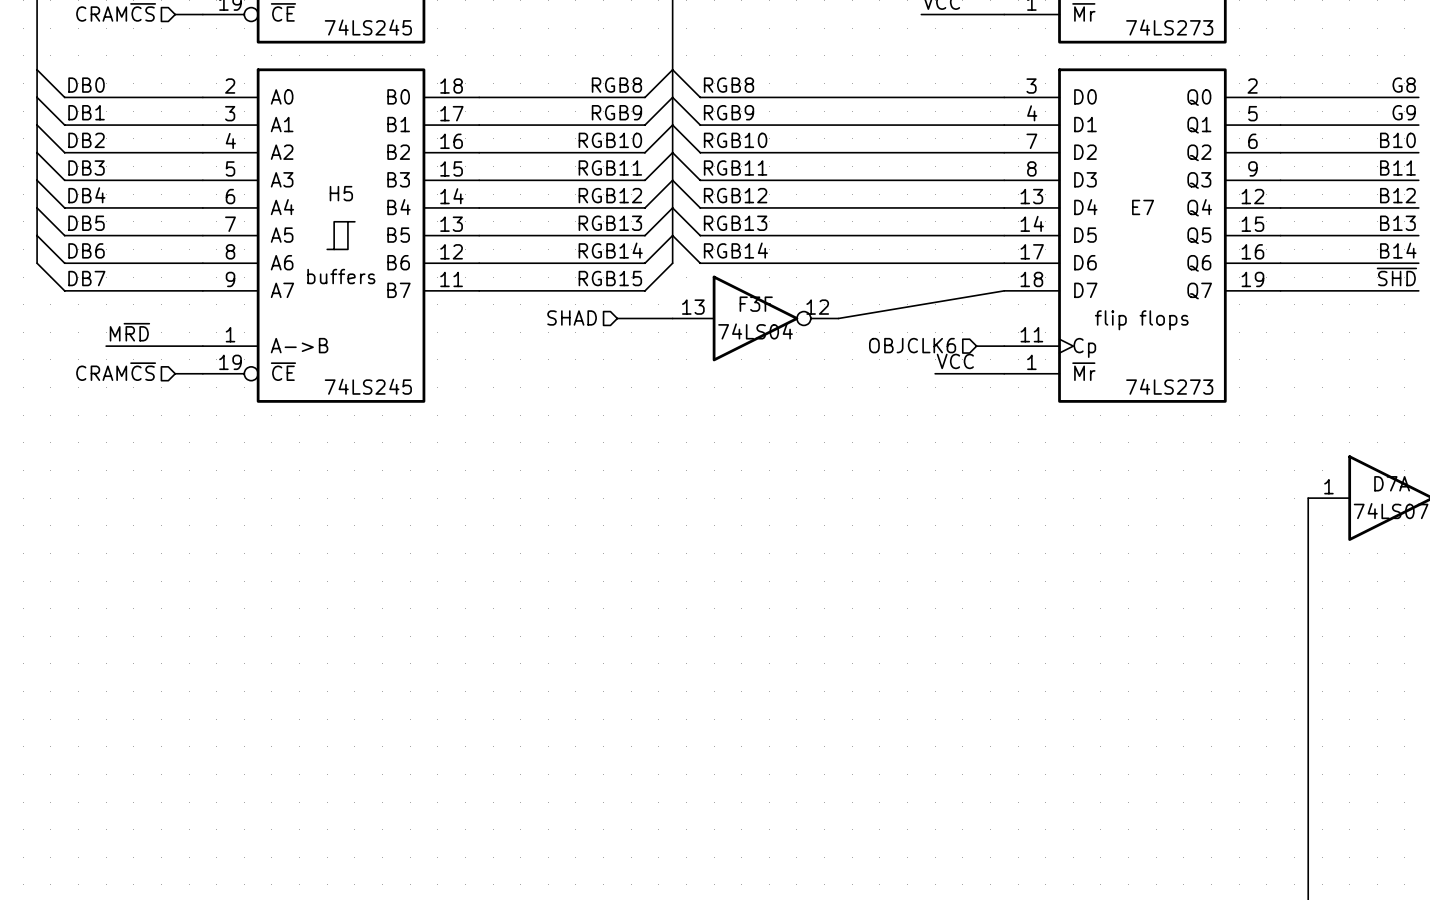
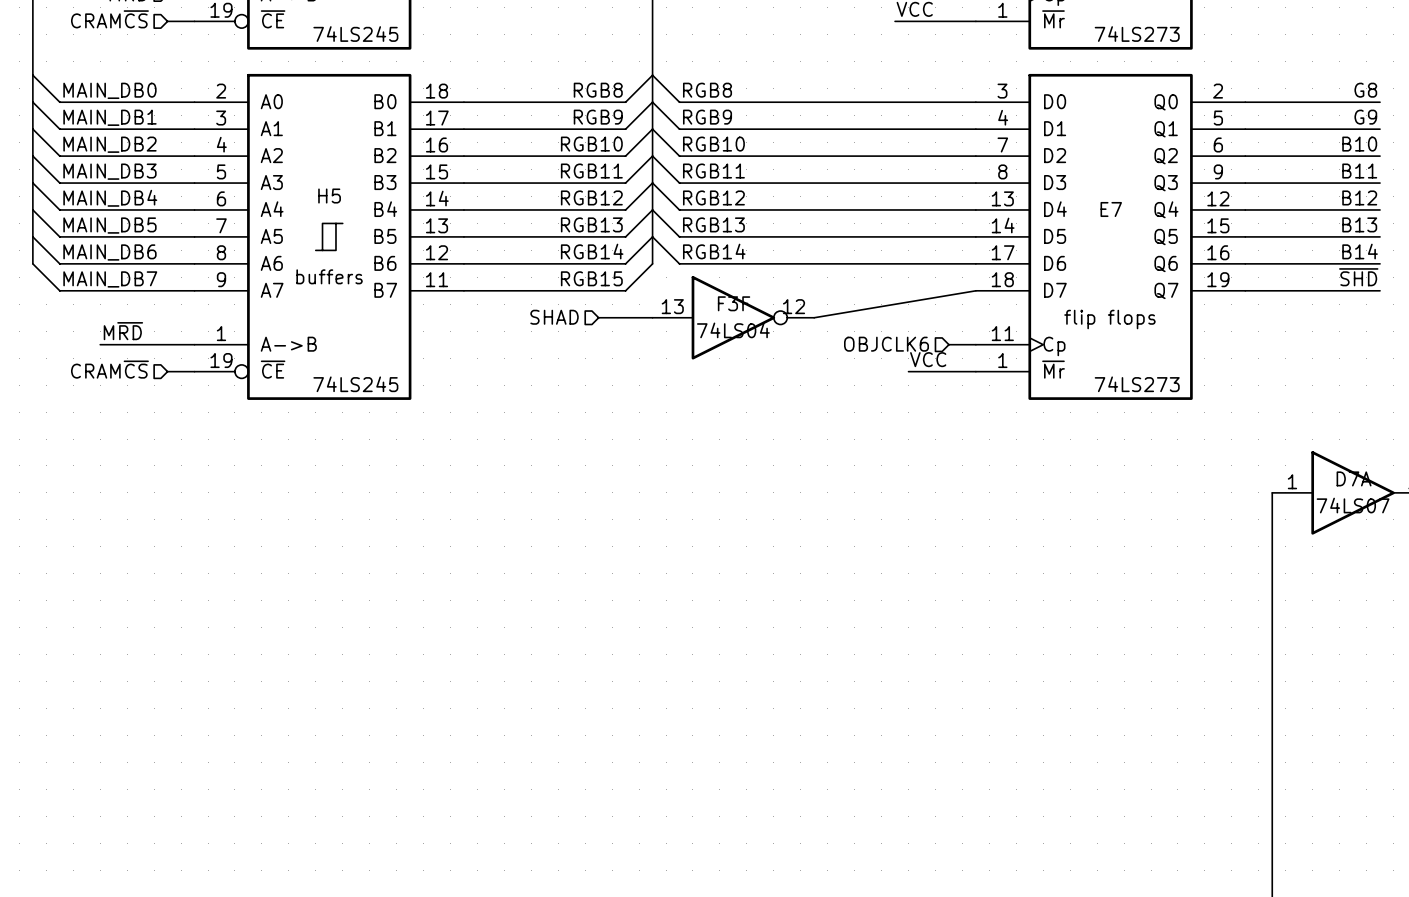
label: DB0 (86, 85) -> MAIN_DB0 (109, 90)
label: DB1 (86, 112) -> MAIN_DB1 (109, 117)
label: DB2 (86, 140) -> MAIN_DB2 (109, 144)
label: DB3 (86, 168) -> MAIN_DB3 (109, 171)
label: DB4 (86, 195) -> MAIN_DB4 (110, 198)
label: DB5 (86, 223) -> MAIN_DB5 (109, 225)
label: DB6 (86, 250) -> MAIN_DB6 (109, 252)
label: DB7 (86, 278) -> MAIN_DB7 (110, 279)

